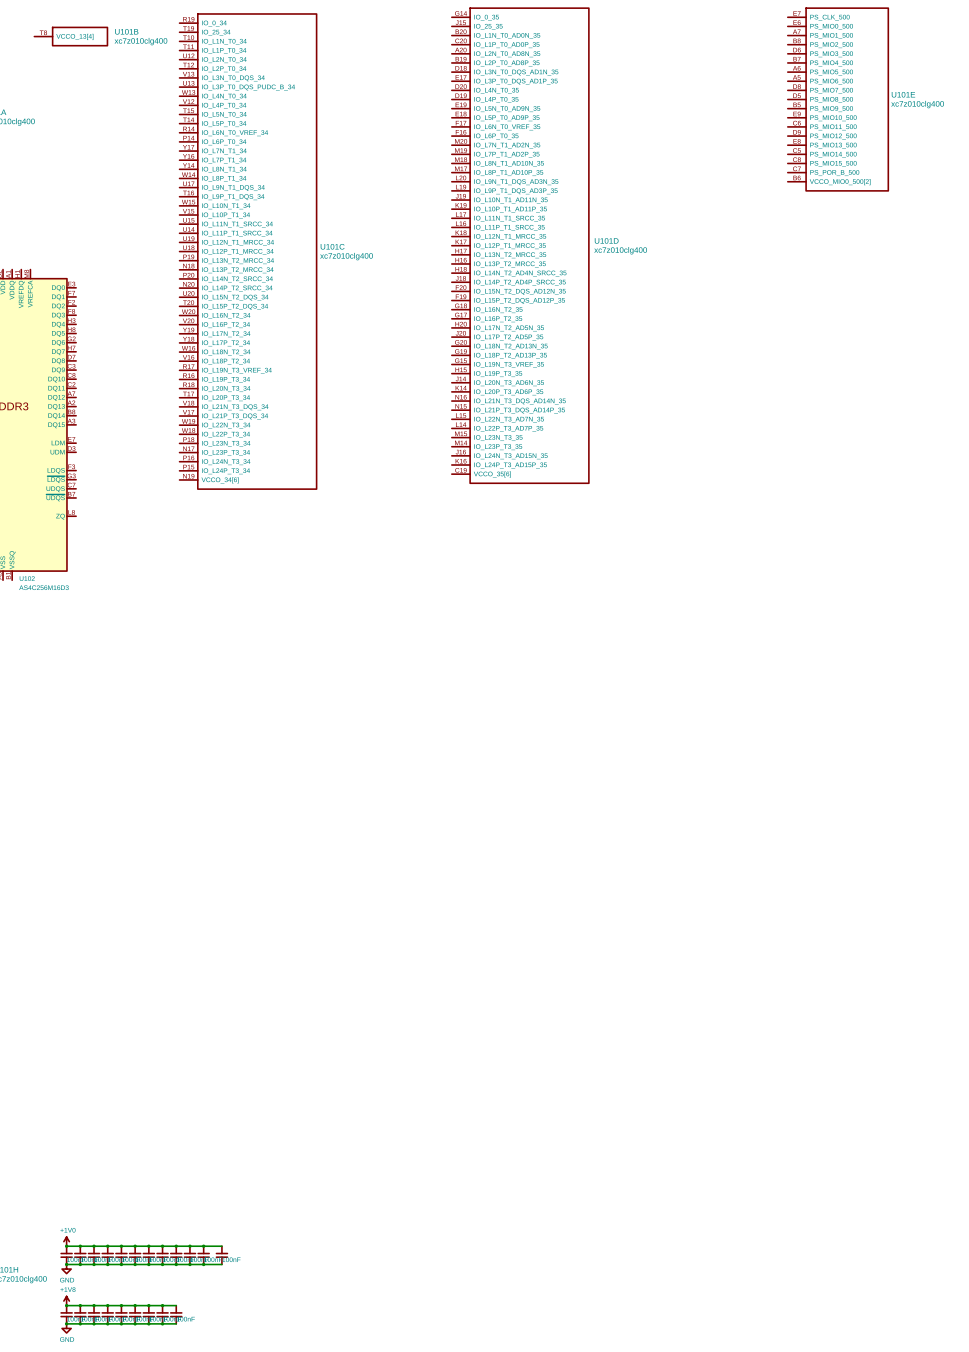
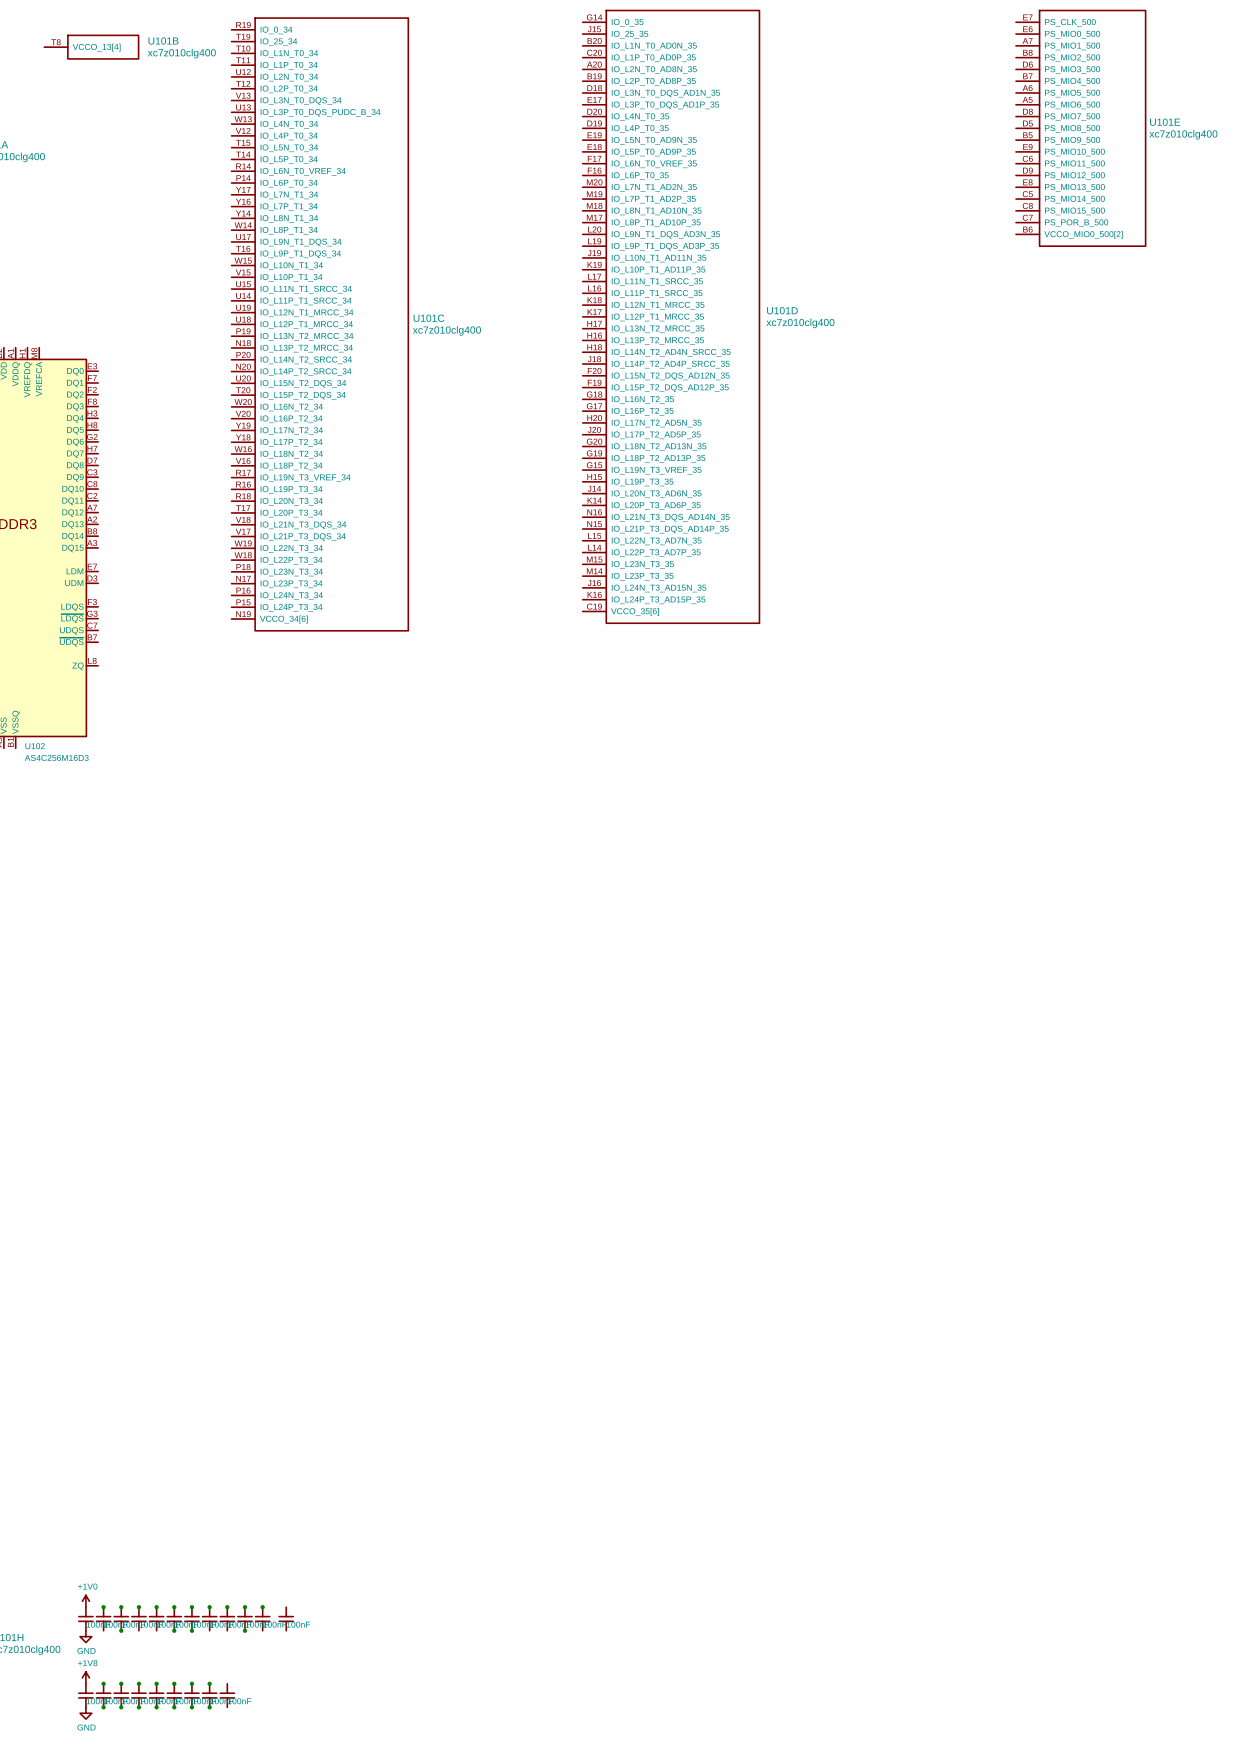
wire: (66, 1246) (221, 1246) -> none
junction: (66, 1246) -> none
wire: (66, 1264) (221, 1264) -> none
junction: (66, 1264) -> none
junction: (80, 1264) -> none
junction: (107, 1264) -> none
junction: (121, 1264) -> none
junction: (162, 1264) -> none
junction: (176, 1264) -> none
junction: (203, 1264) -> none
wire: (66, 1305) (176, 1305) -> none
junction: (66, 1305) -> none
wire: (66, 1323) (176, 1323) -> none
junction: (66, 1323) -> none

